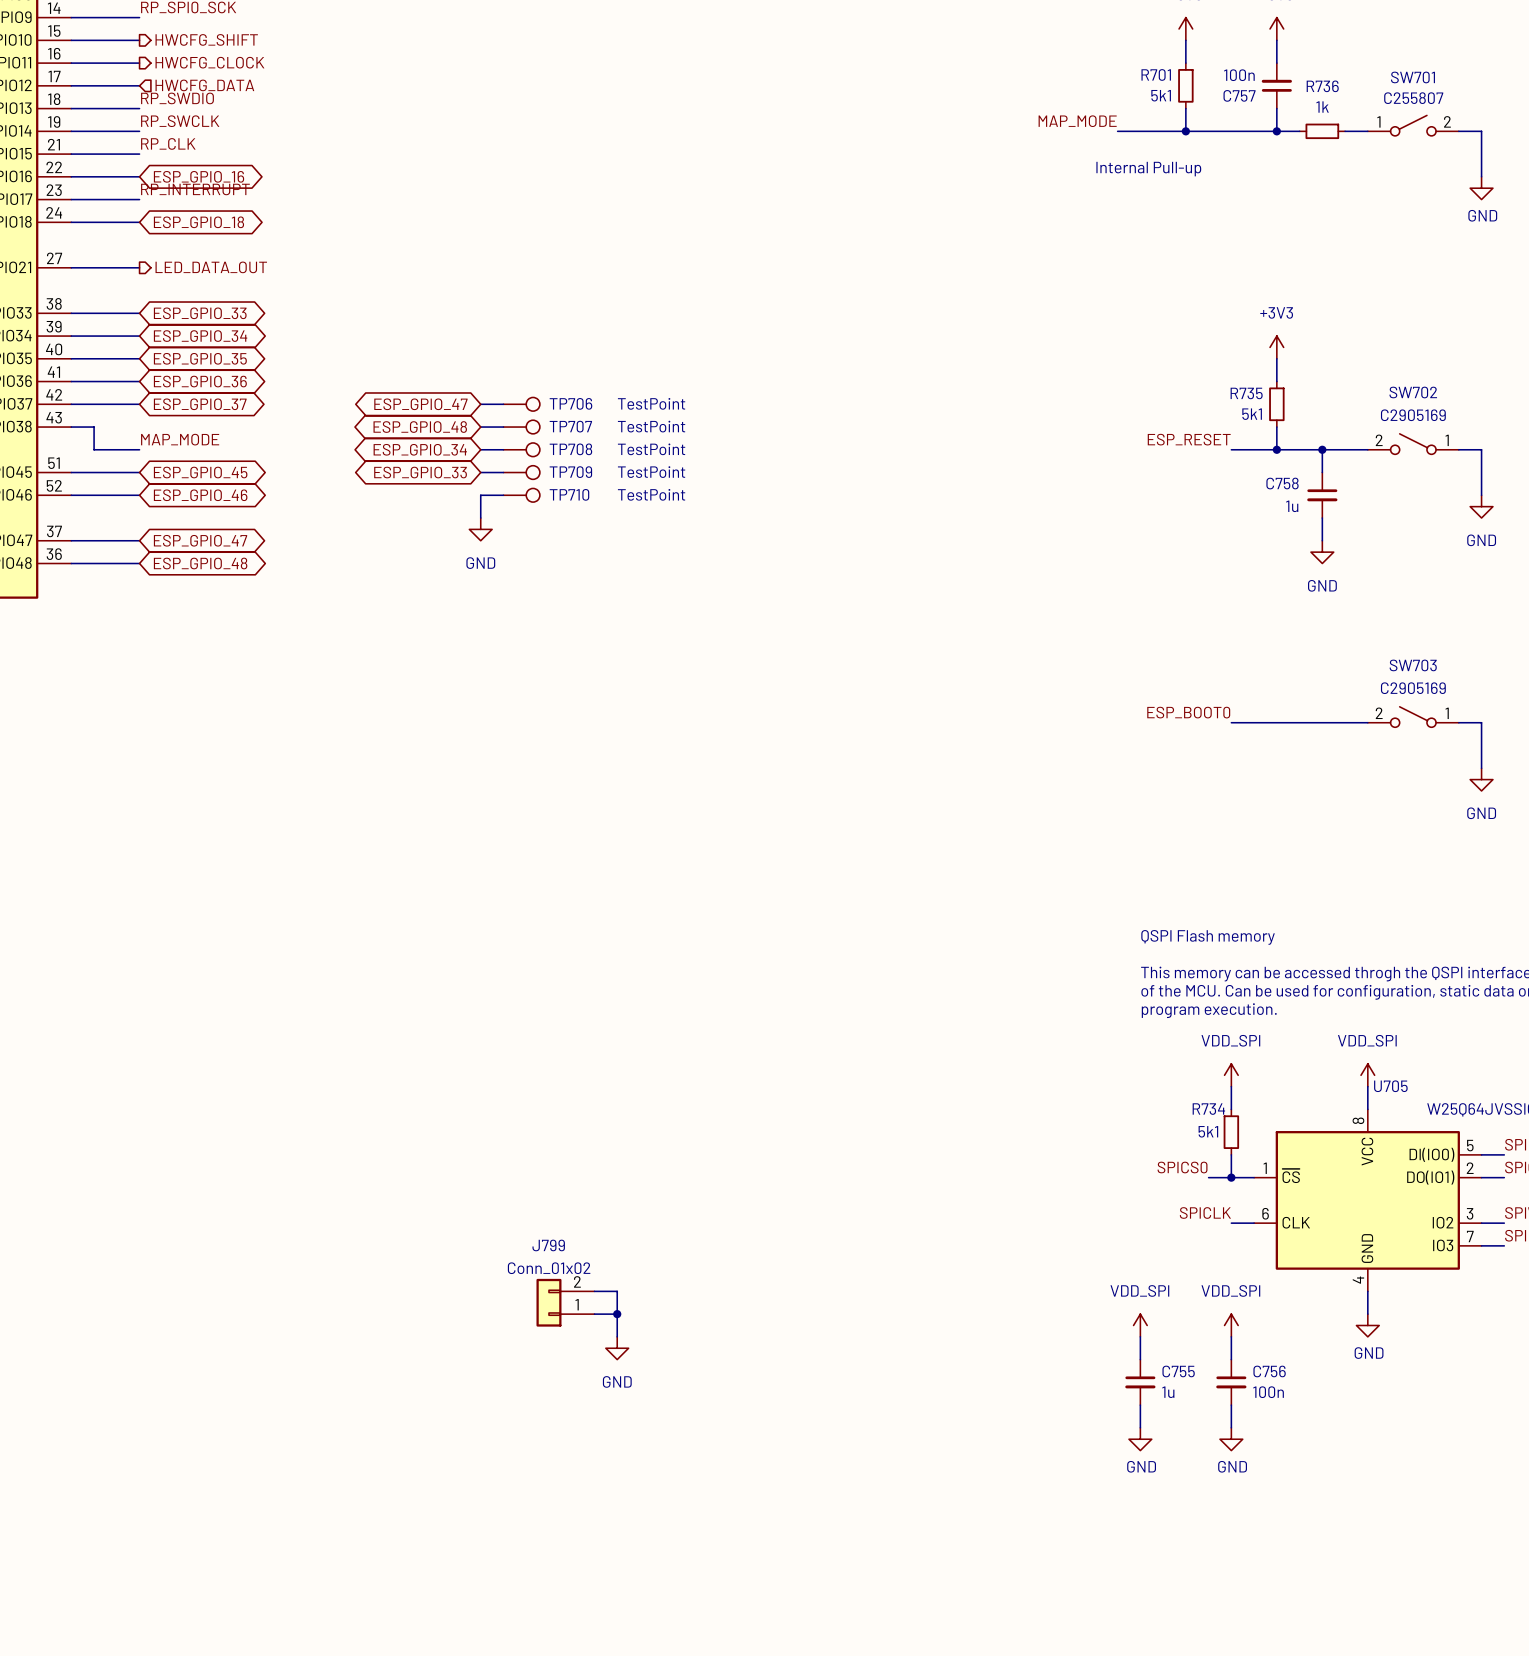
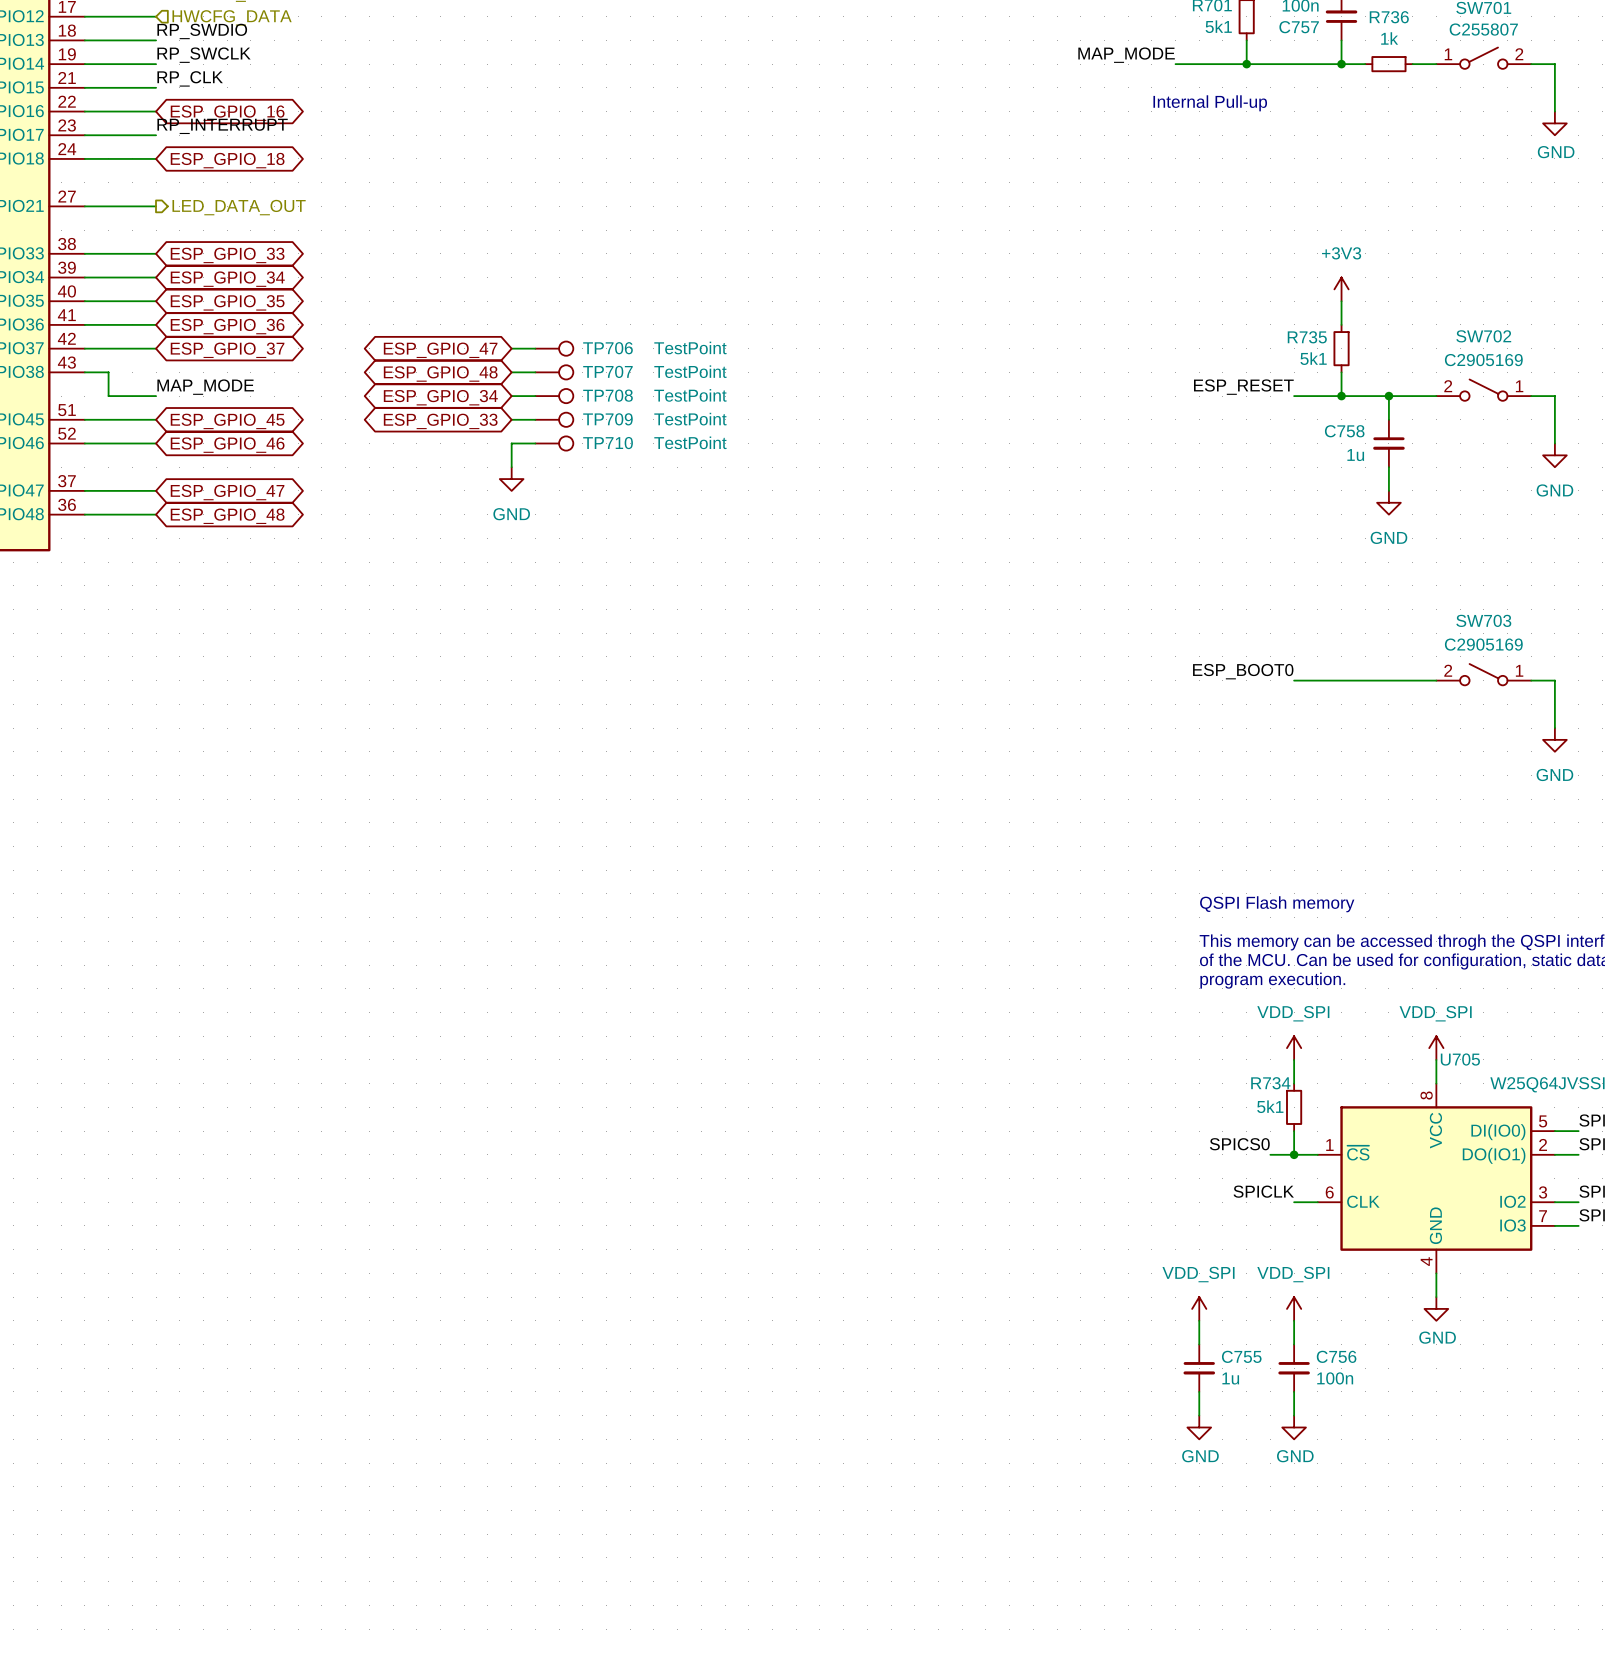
wire: (594, 1291) (617, 1291) (617, 1336) -> none
J799: Conn_01x02 (565, 1302) -> none
wire: (594, 1314) (617, 1314) -> none
junction: (617, 1314) -> none
power symbol: GND (617, 1348) -> none

